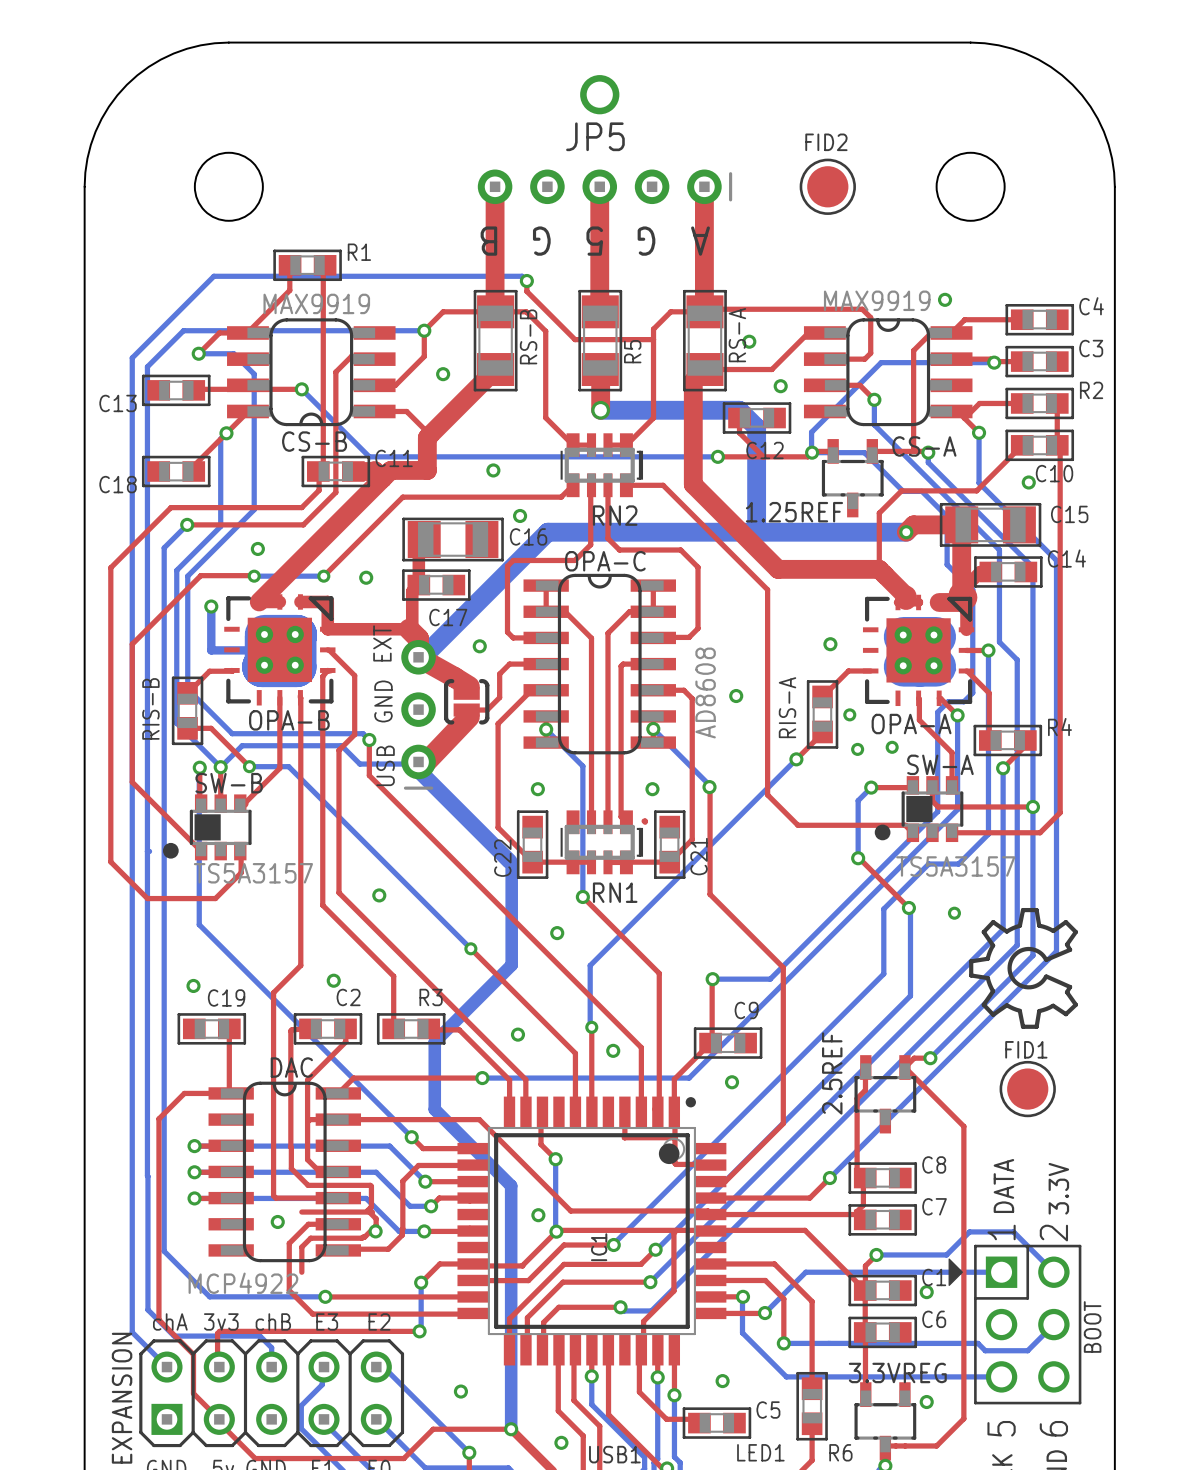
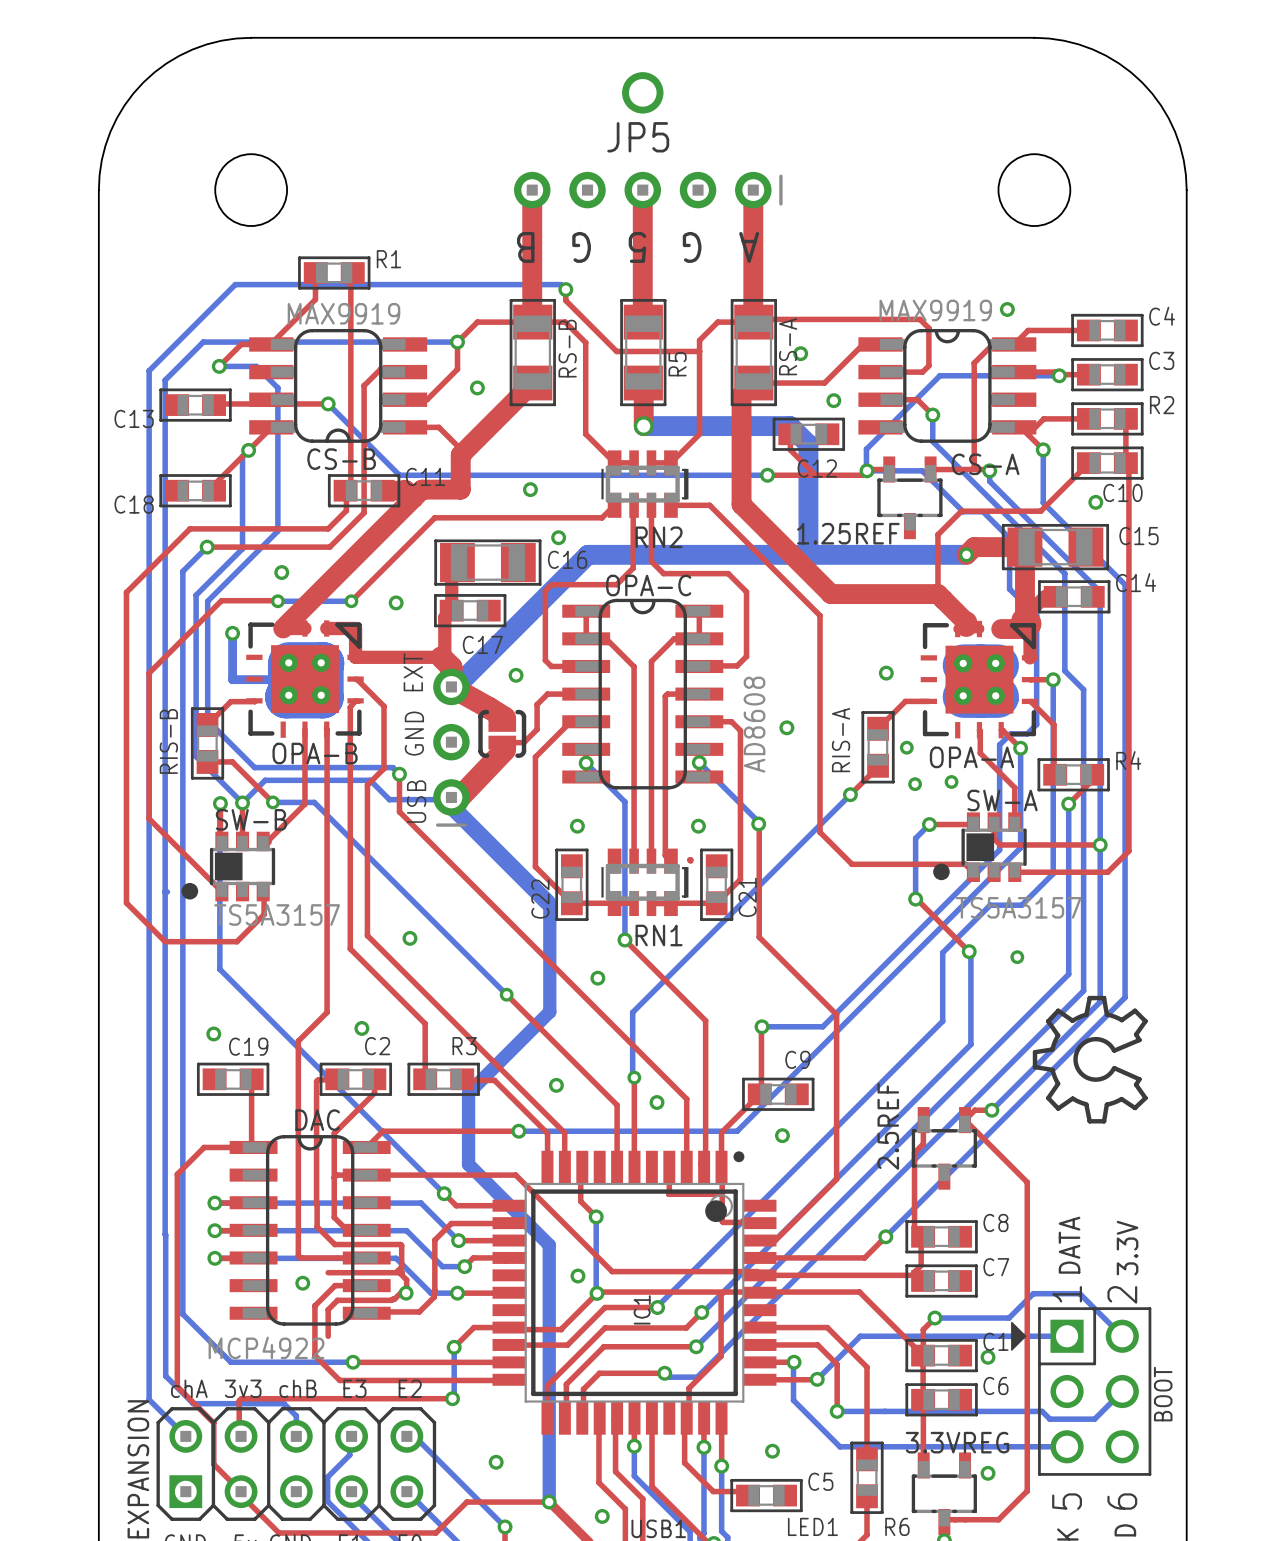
FID2: (827, 186) -> none
drawing position: (1023, 968) -> (1090, 1059)
FID1: (1027, 1089) -> none

